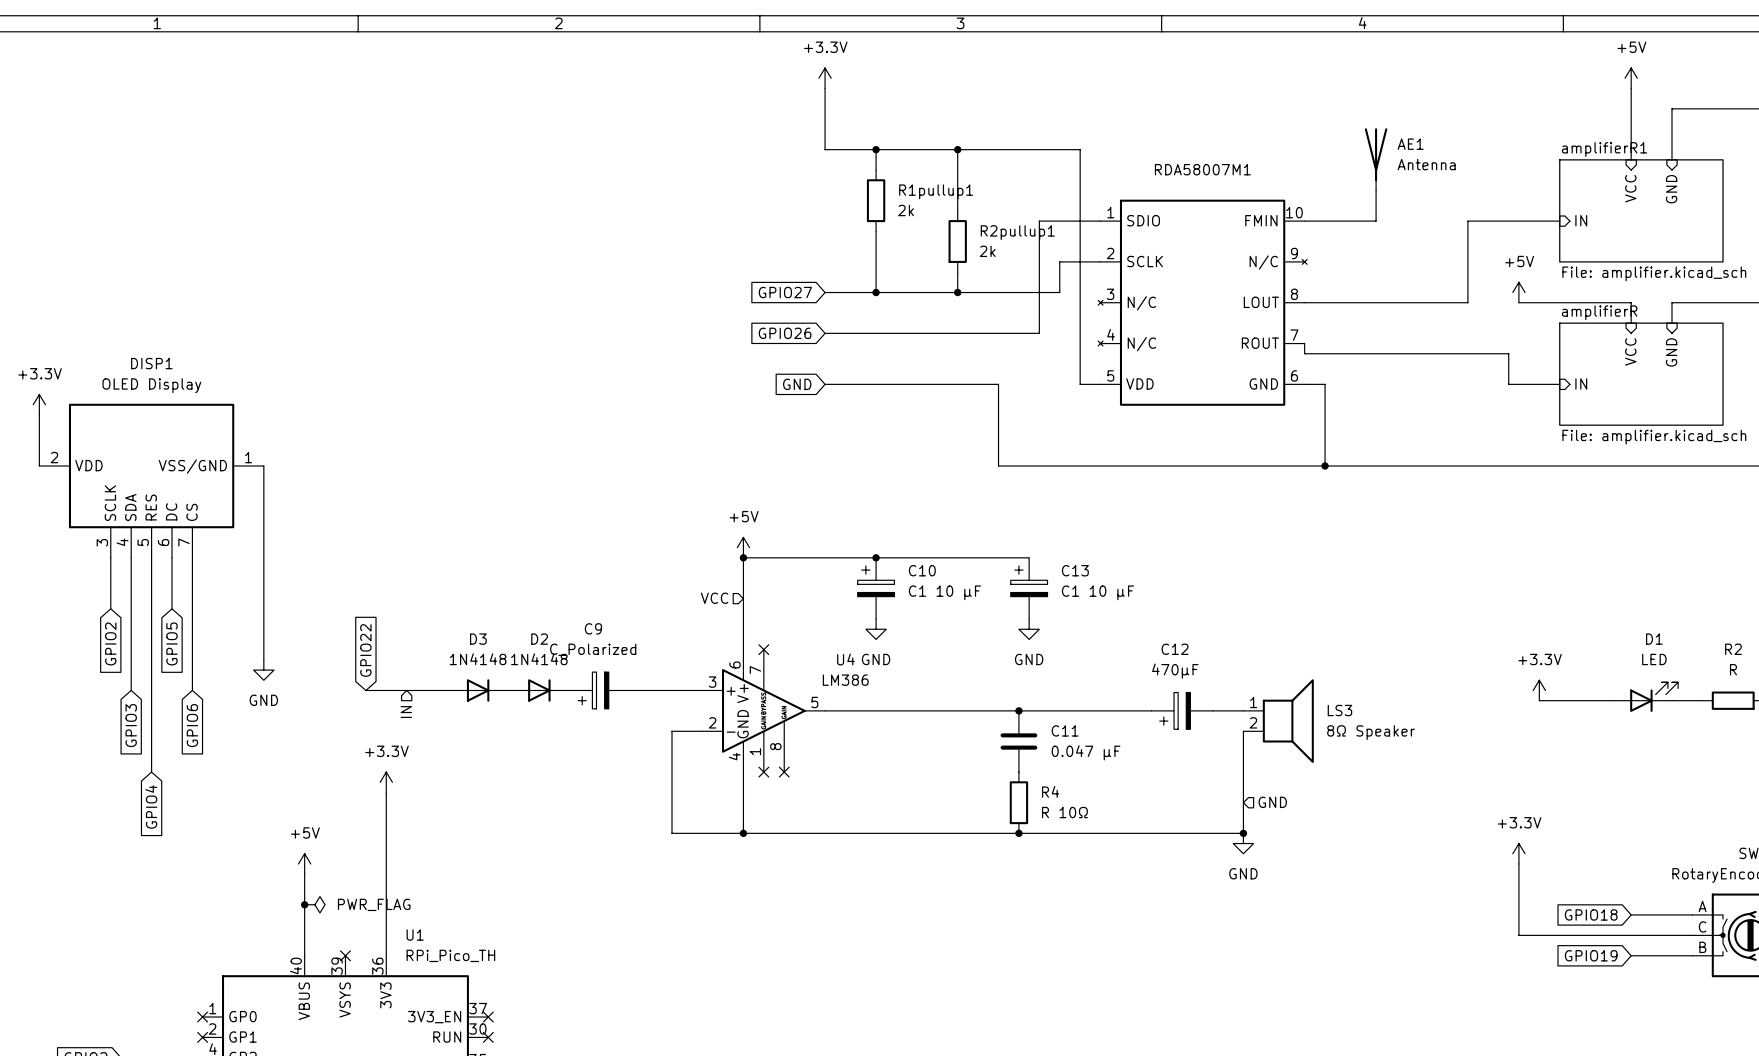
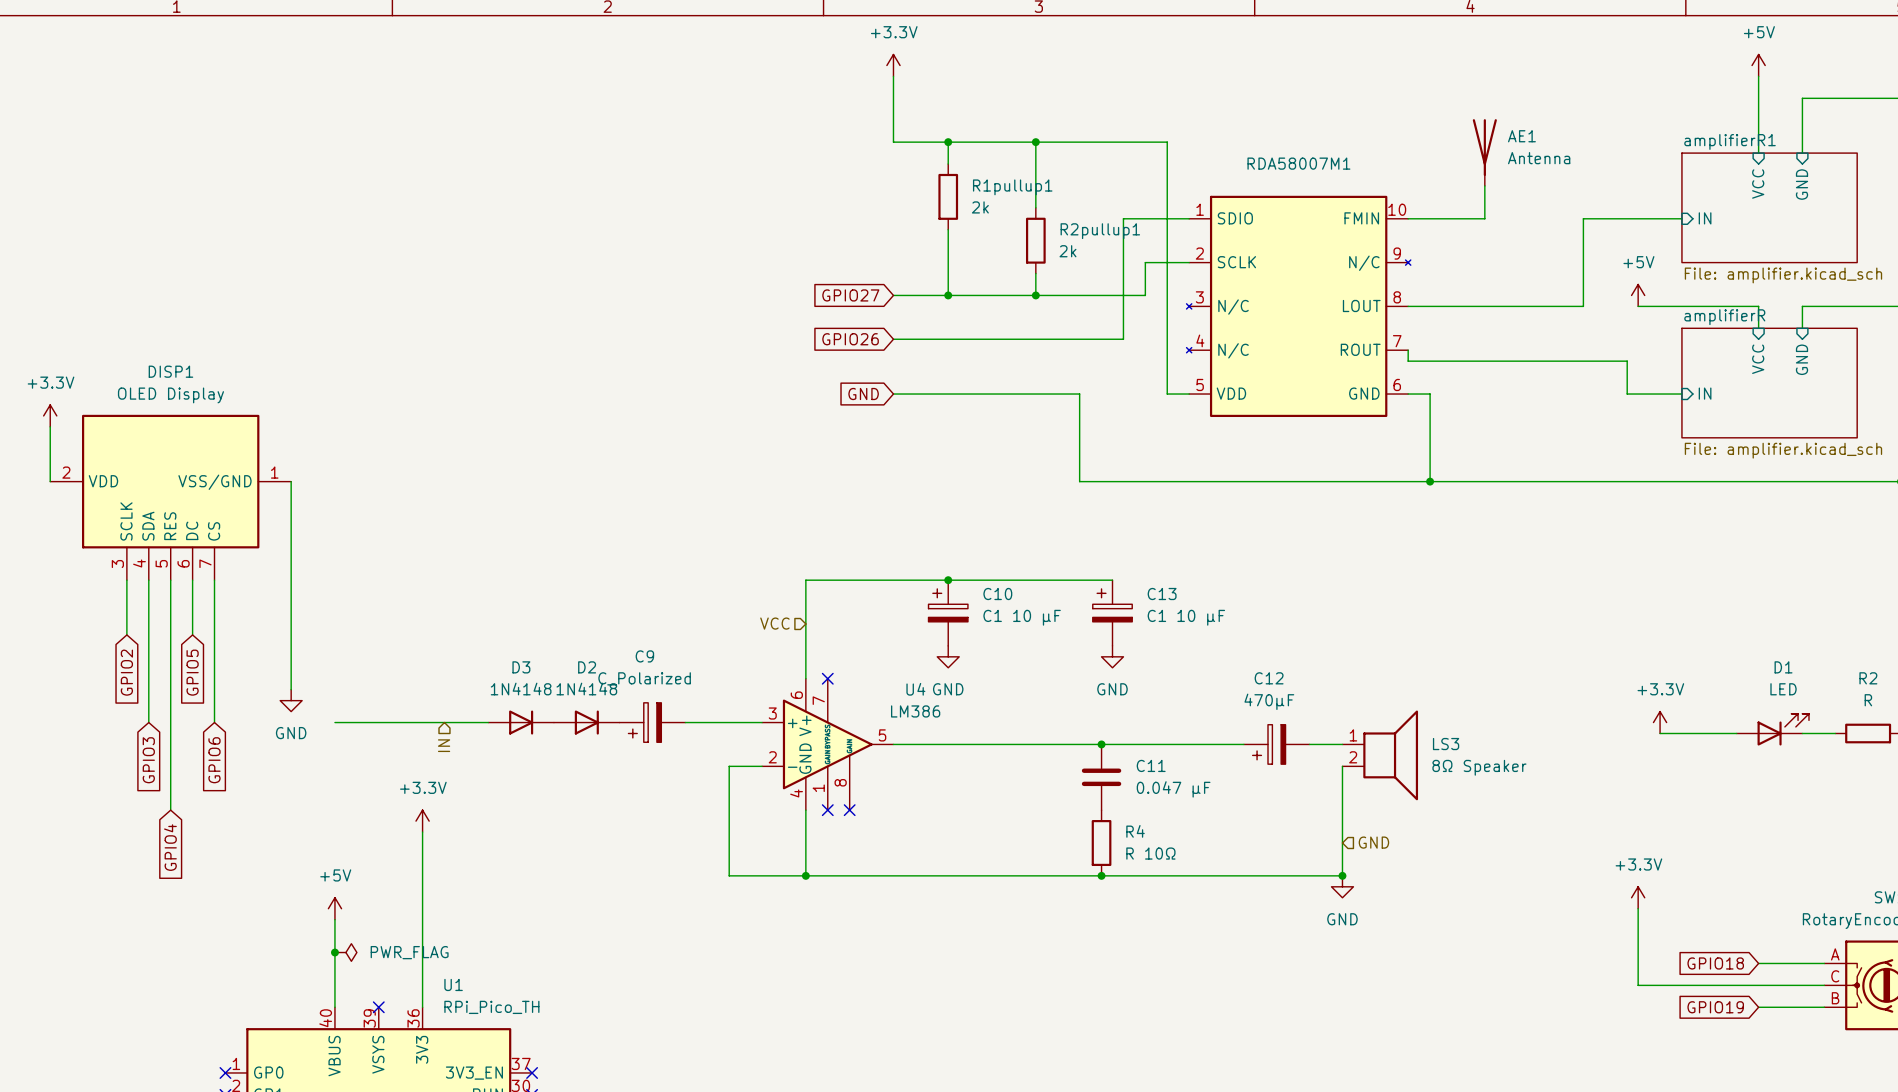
power symbol: +5V (743, 547) -> none
junction: (743, 557) -> none
global label: GPIO22 (365, 650) -> none
wire: none -> (334, 722) (400, 722)

